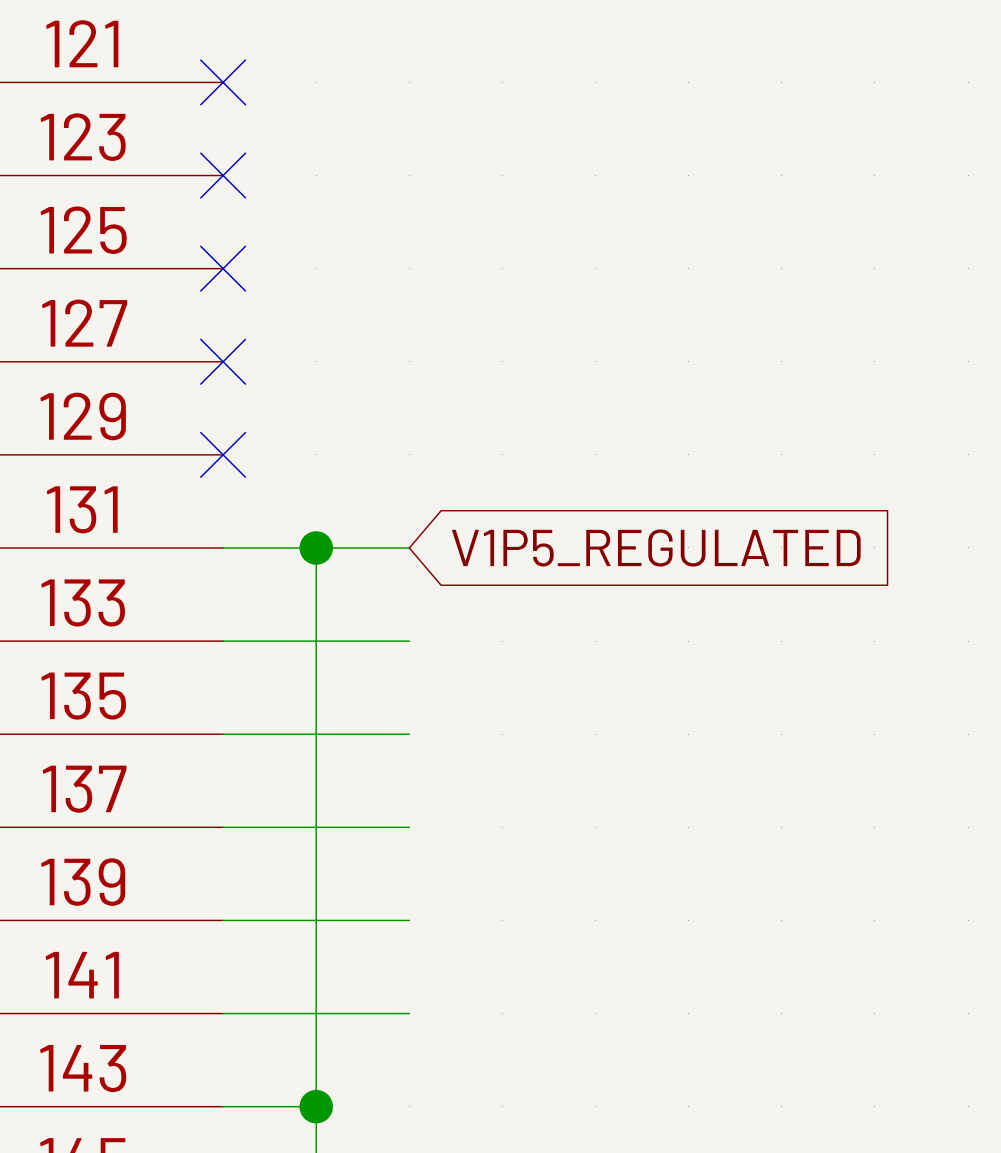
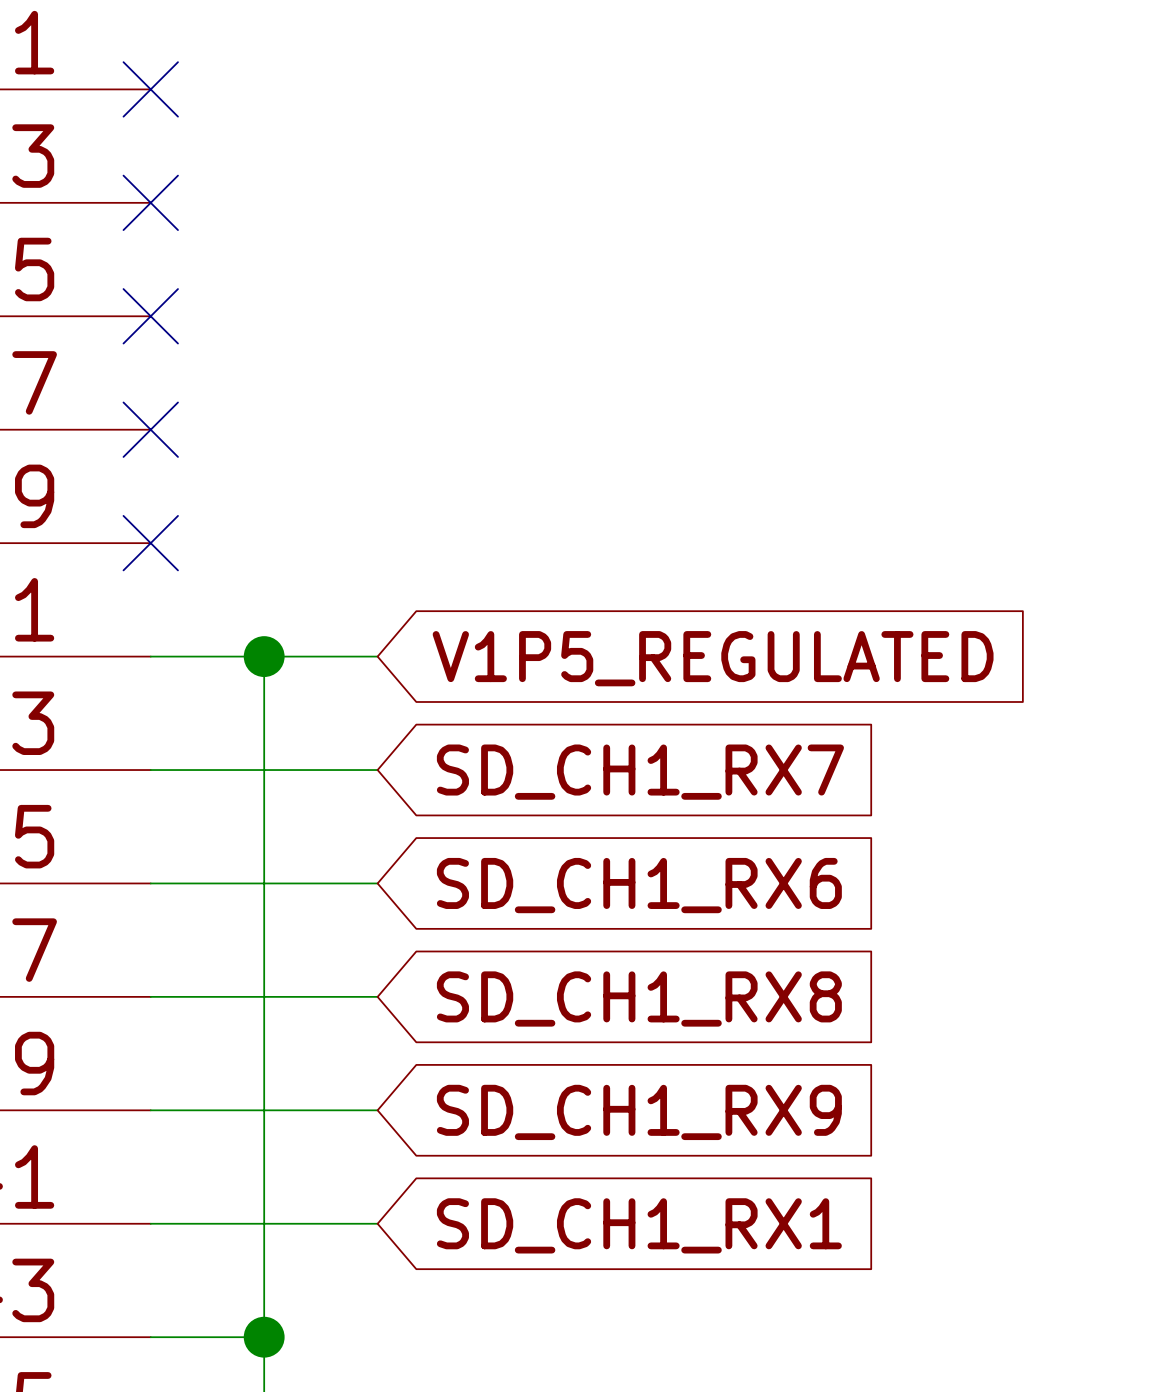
global label: none -> SD_CH1_RX7 (640, 772)
global label: none -> SD_CH1_RX6 (639, 885)
global label: none -> SD_CH1_RX8 (639, 998)
global label: none -> SD_CH1_RX9 (639, 1112)
global label: none -> SD_CH1_RX1 (639, 1225)

